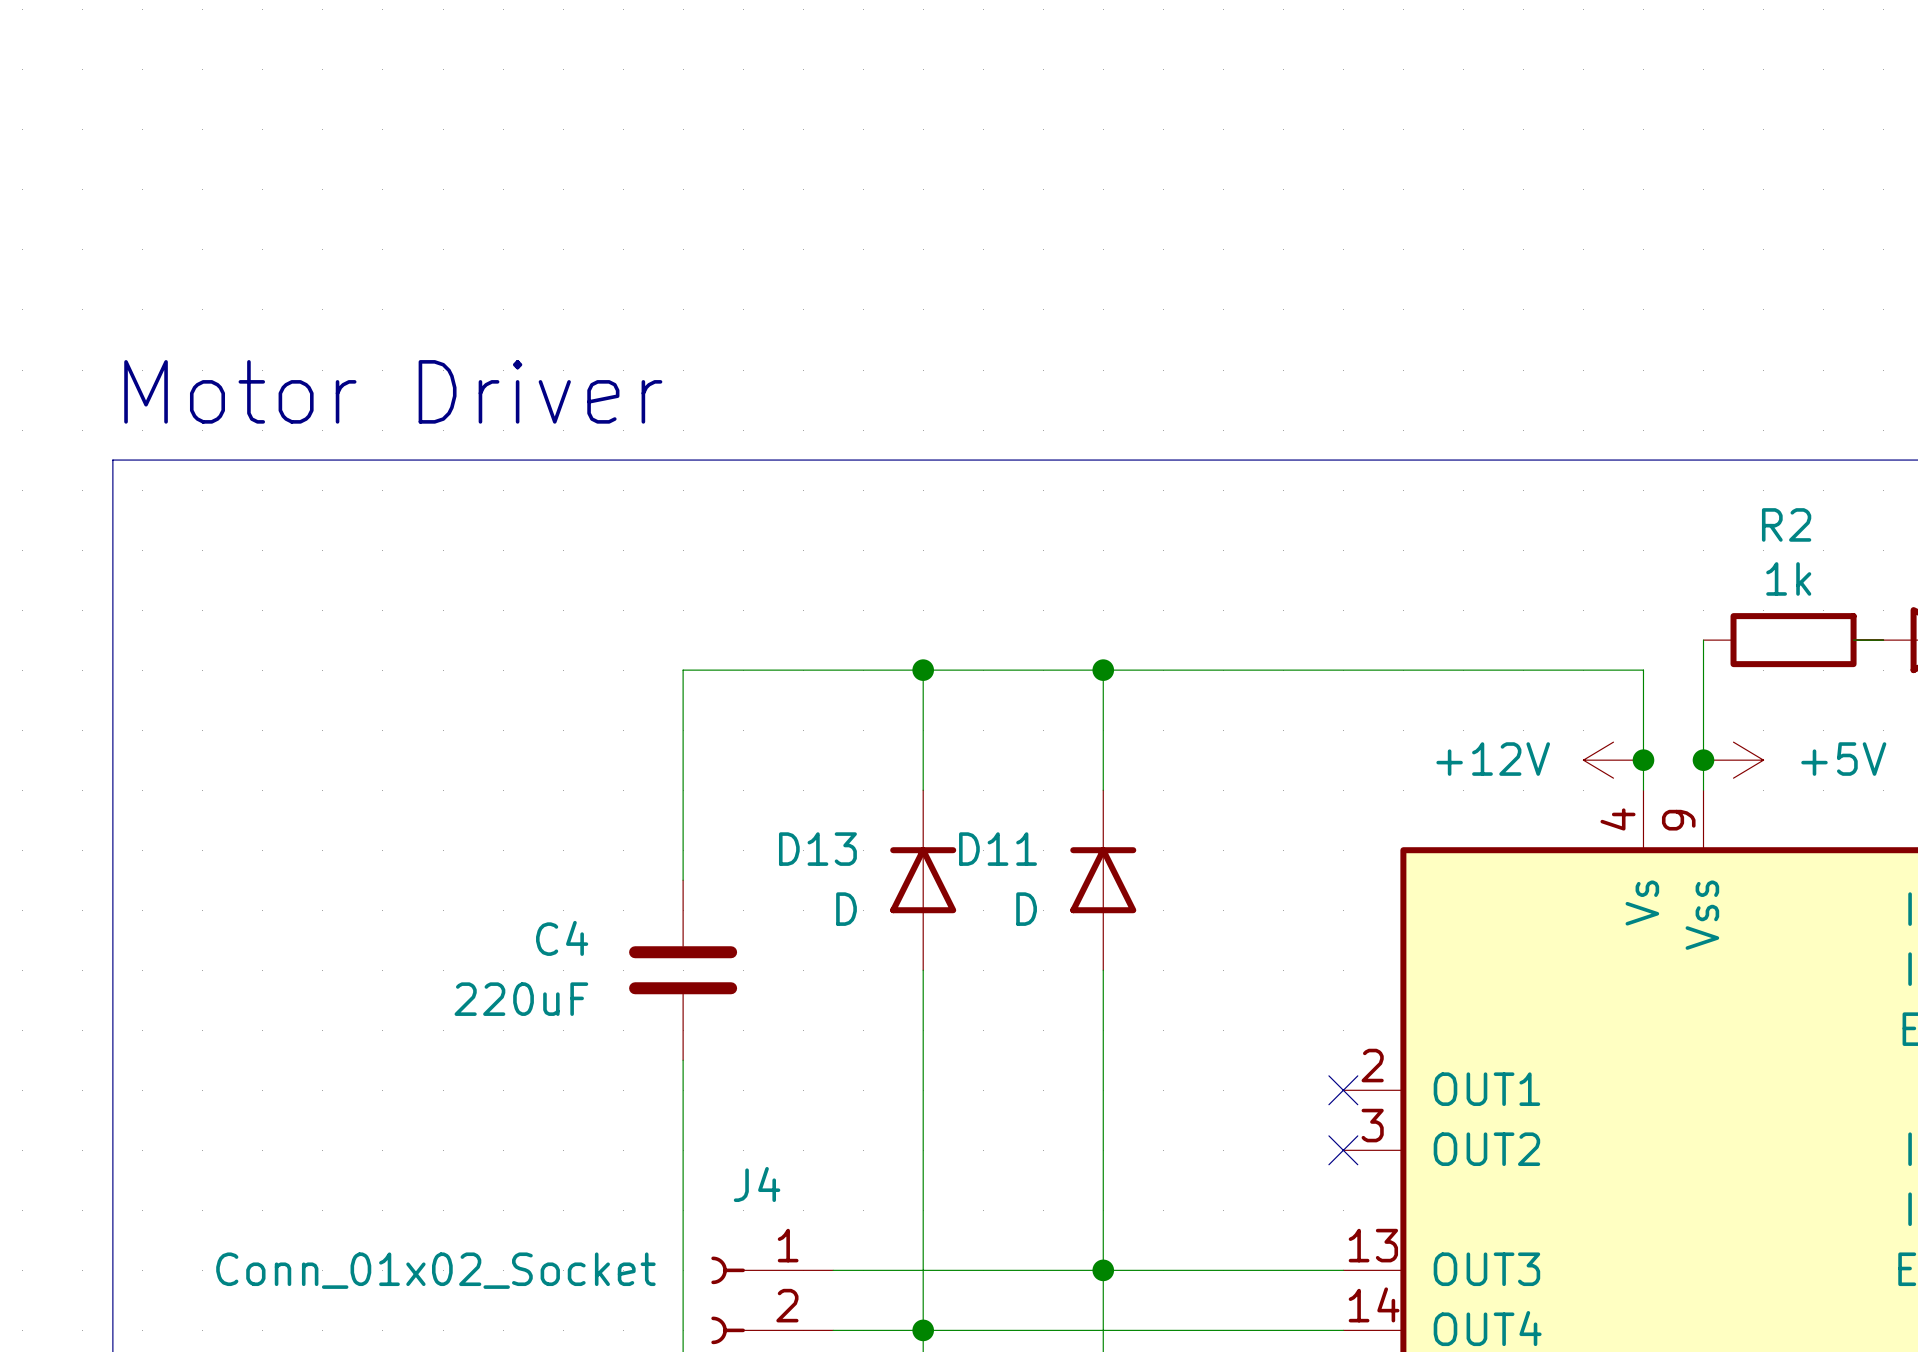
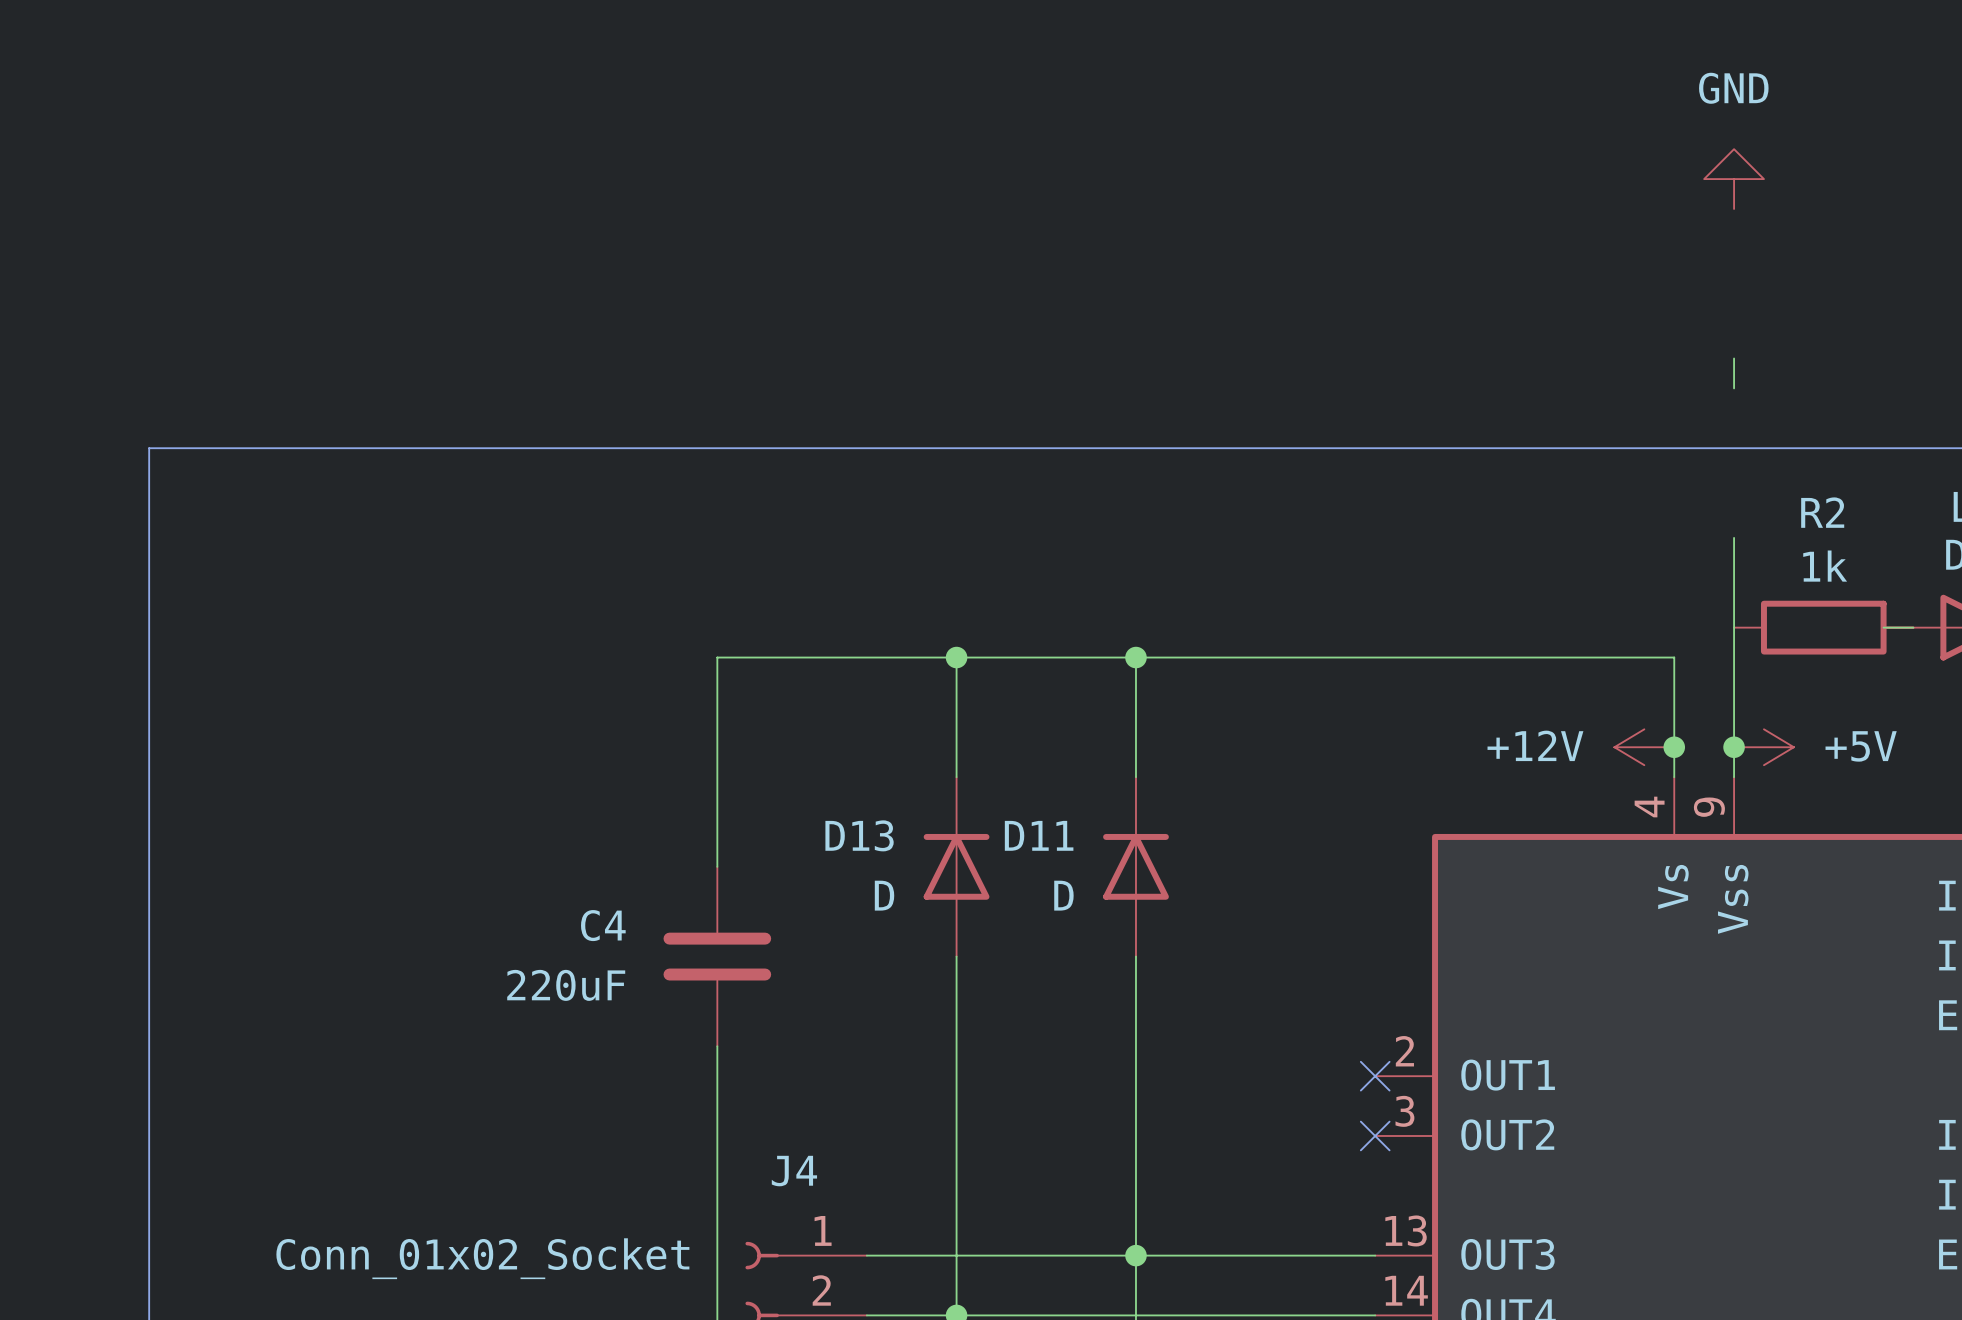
power symbol: none -> GND (1734, 179)
wire: none -> (1734, 358) (1734, 388)
text: Motor Driver (393, 391) -> none
wire: none -> (1734, 537) (1734, 627)

